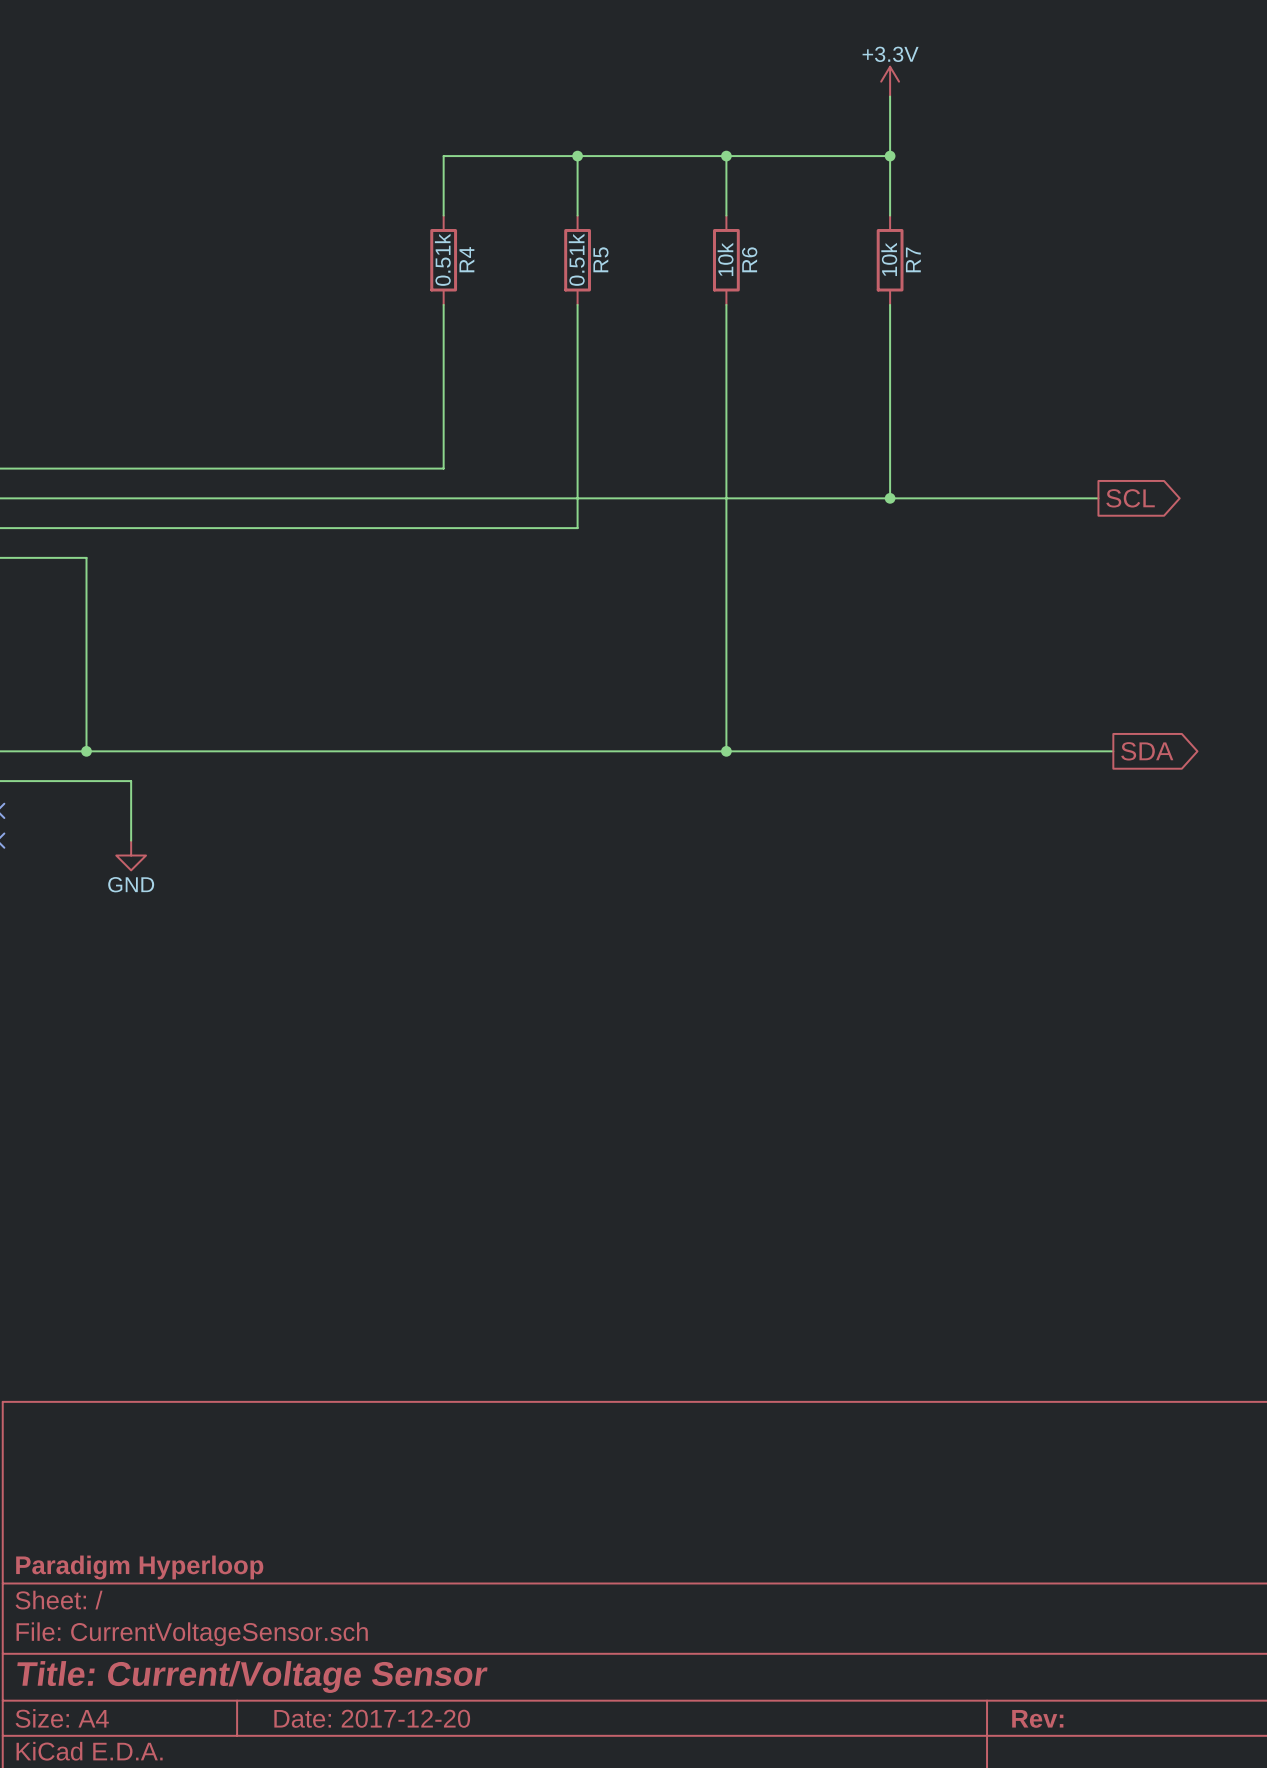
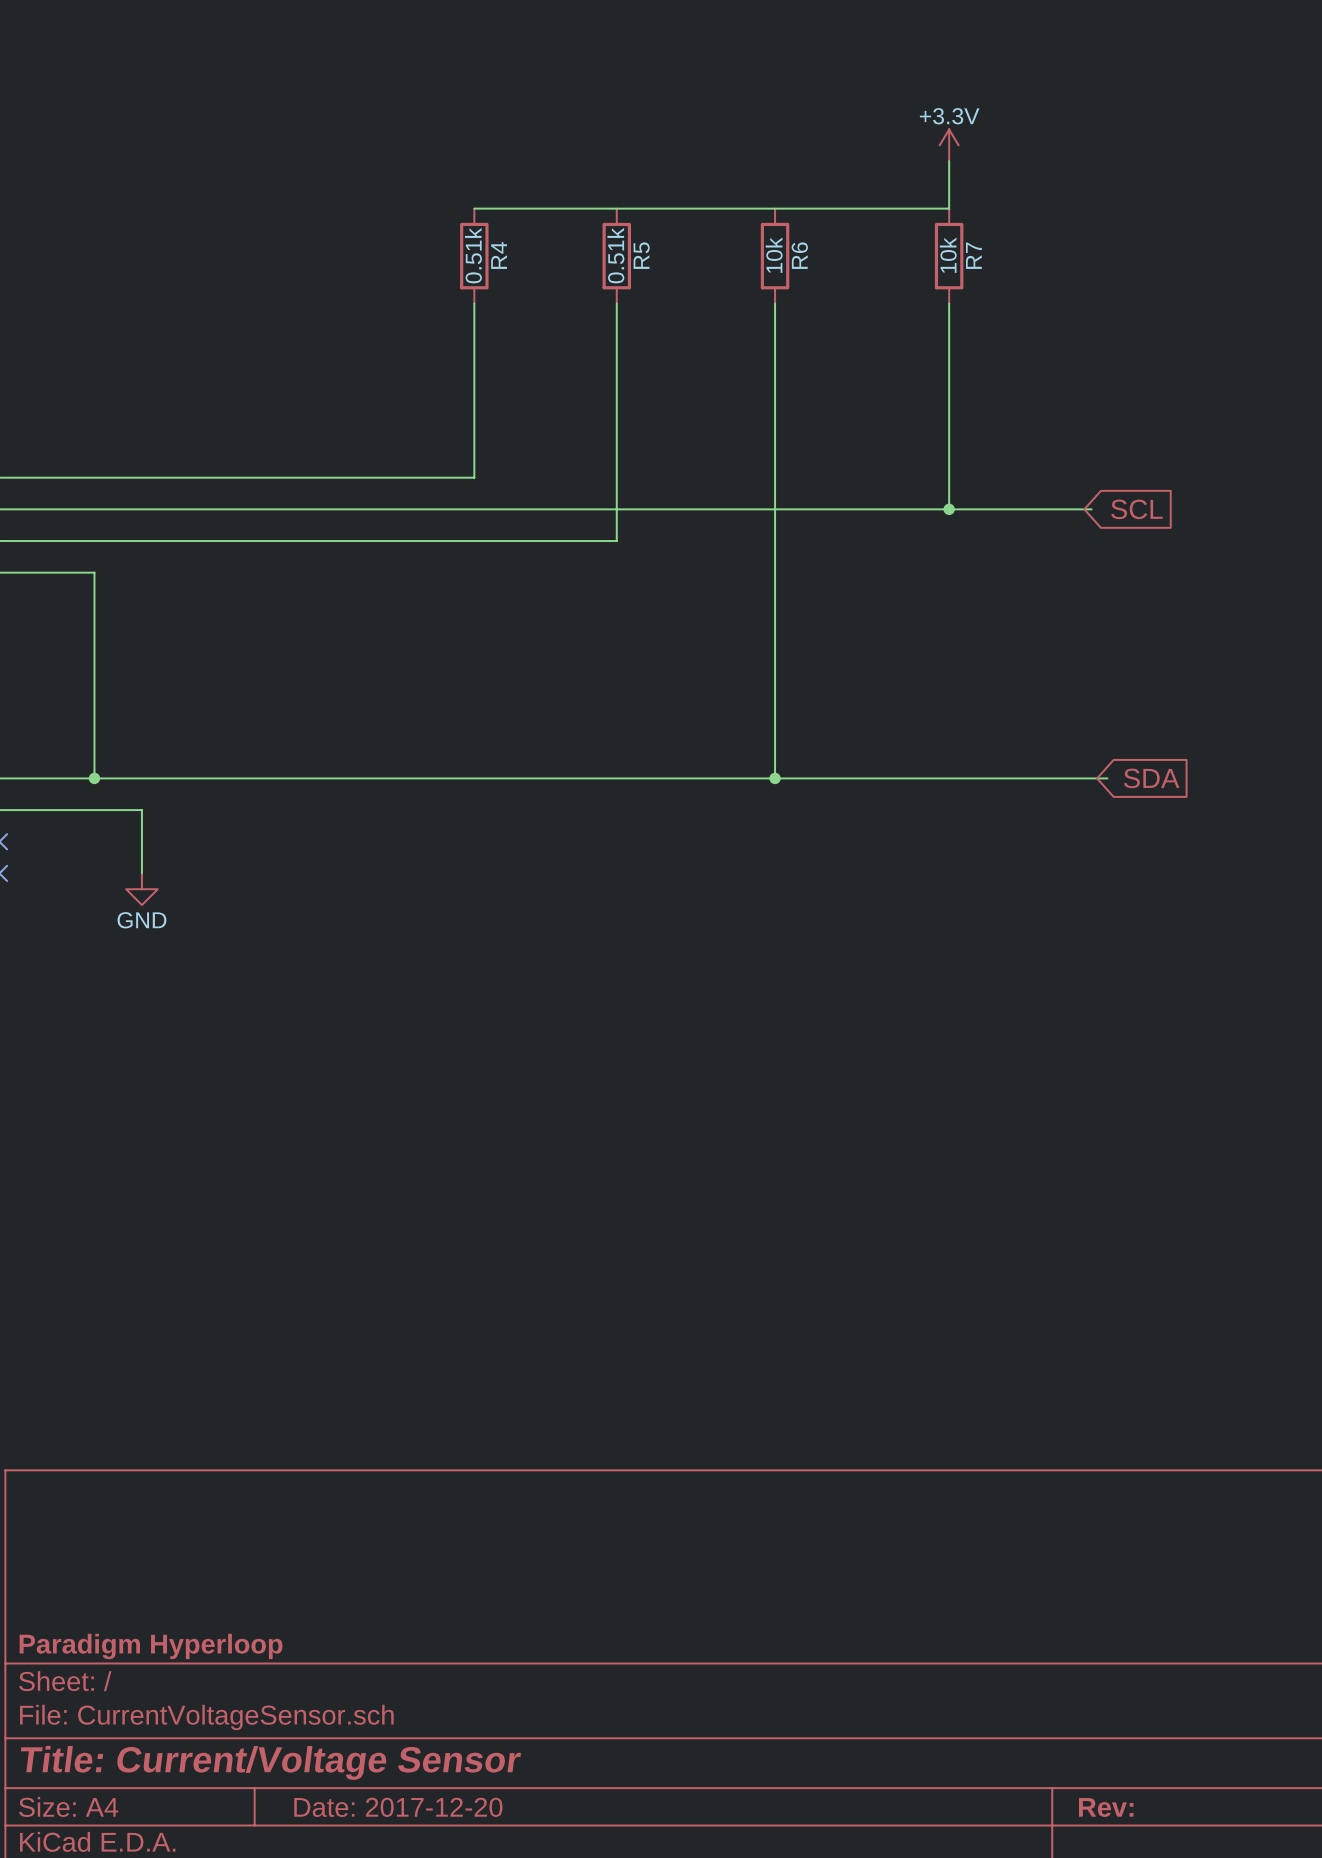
power symbol position: +3.3V (890, 81) -> +3.3V (949, 145)
wire: (890, 96) (890, 170) -> none
wire: (577, 156) (577, 215) -> none
junction: (577, 156) -> none
wire: (726, 156) (726, 215) -> none
junction: (726, 156) -> none
wire: (890, 156) (443, 156) (443, 215) -> (949, 208) (474, 208)
junction: (890, 156) -> none
wire: (1024, 498) (1098, 498) -> none
global label rotation: 0° (1130, 498) -> 180° (1136, 509)
wire: (1038, 751) (1113, 751) -> none
global label rotation: 0° (1147, 751) -> 180° (1151, 778)

